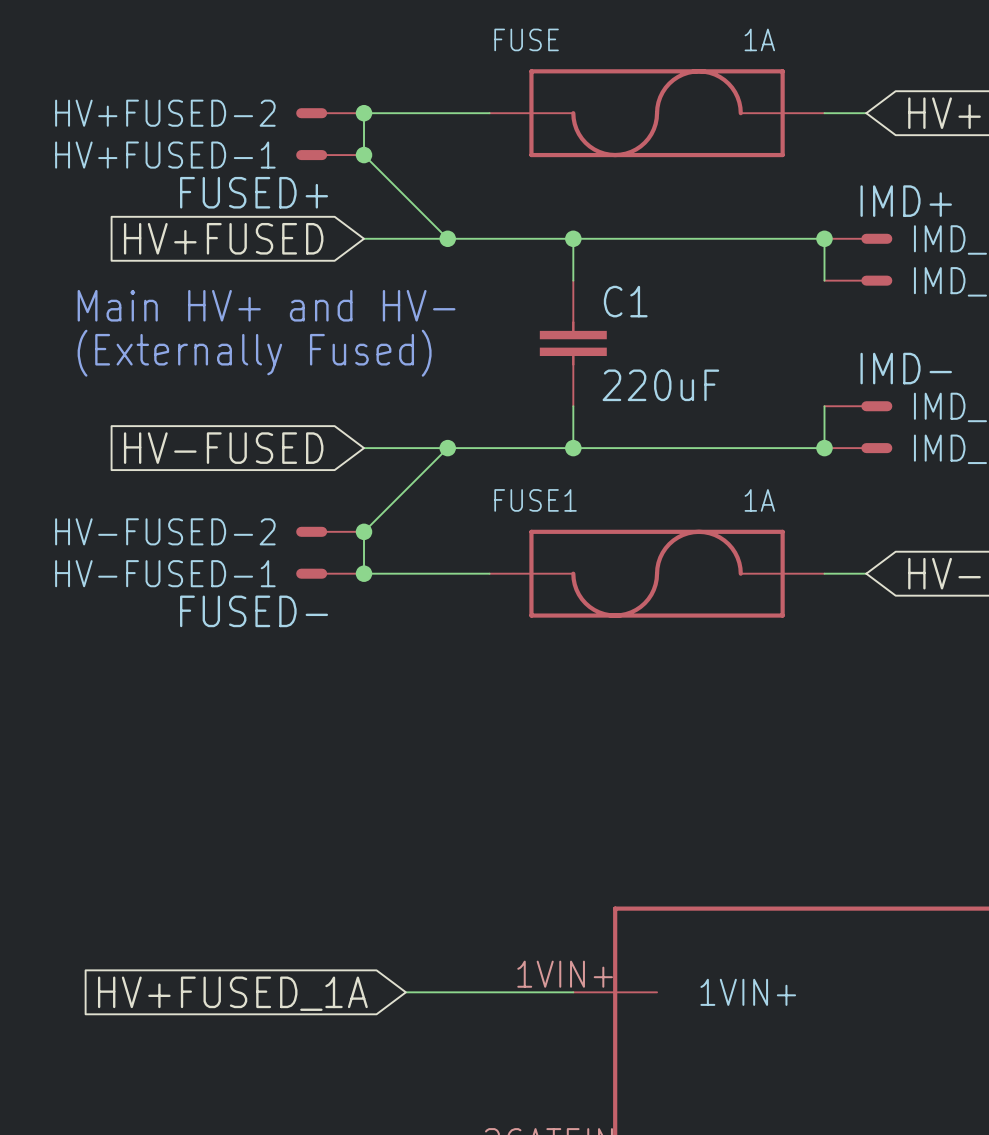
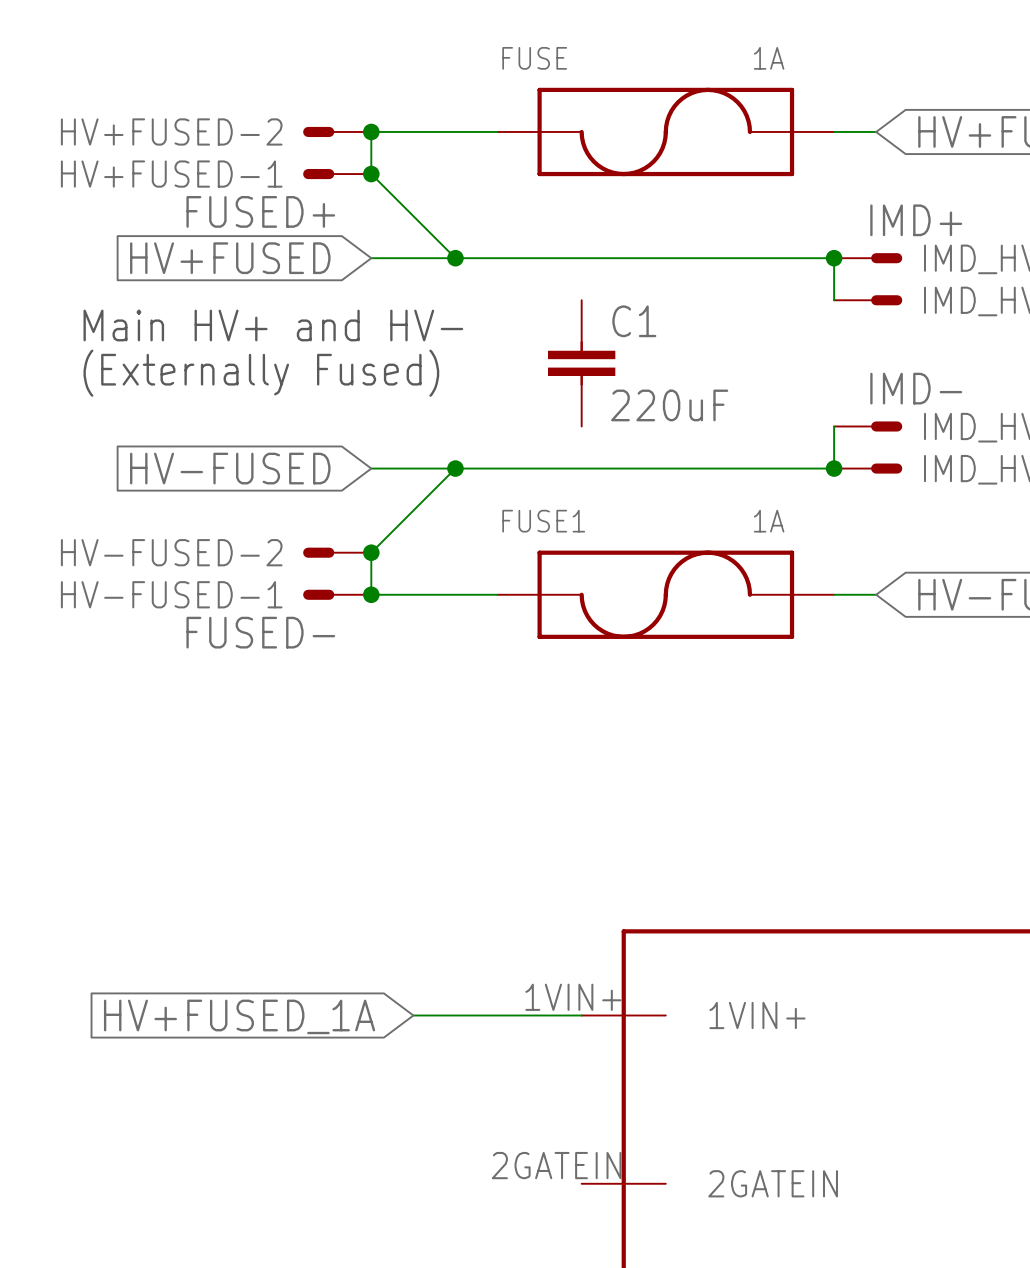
wire: (573, 238) (573, 280) -> none
junction: (573, 238) -> none
wire: (573, 406) (573, 448) -> none
junction: (573, 448) -> none

